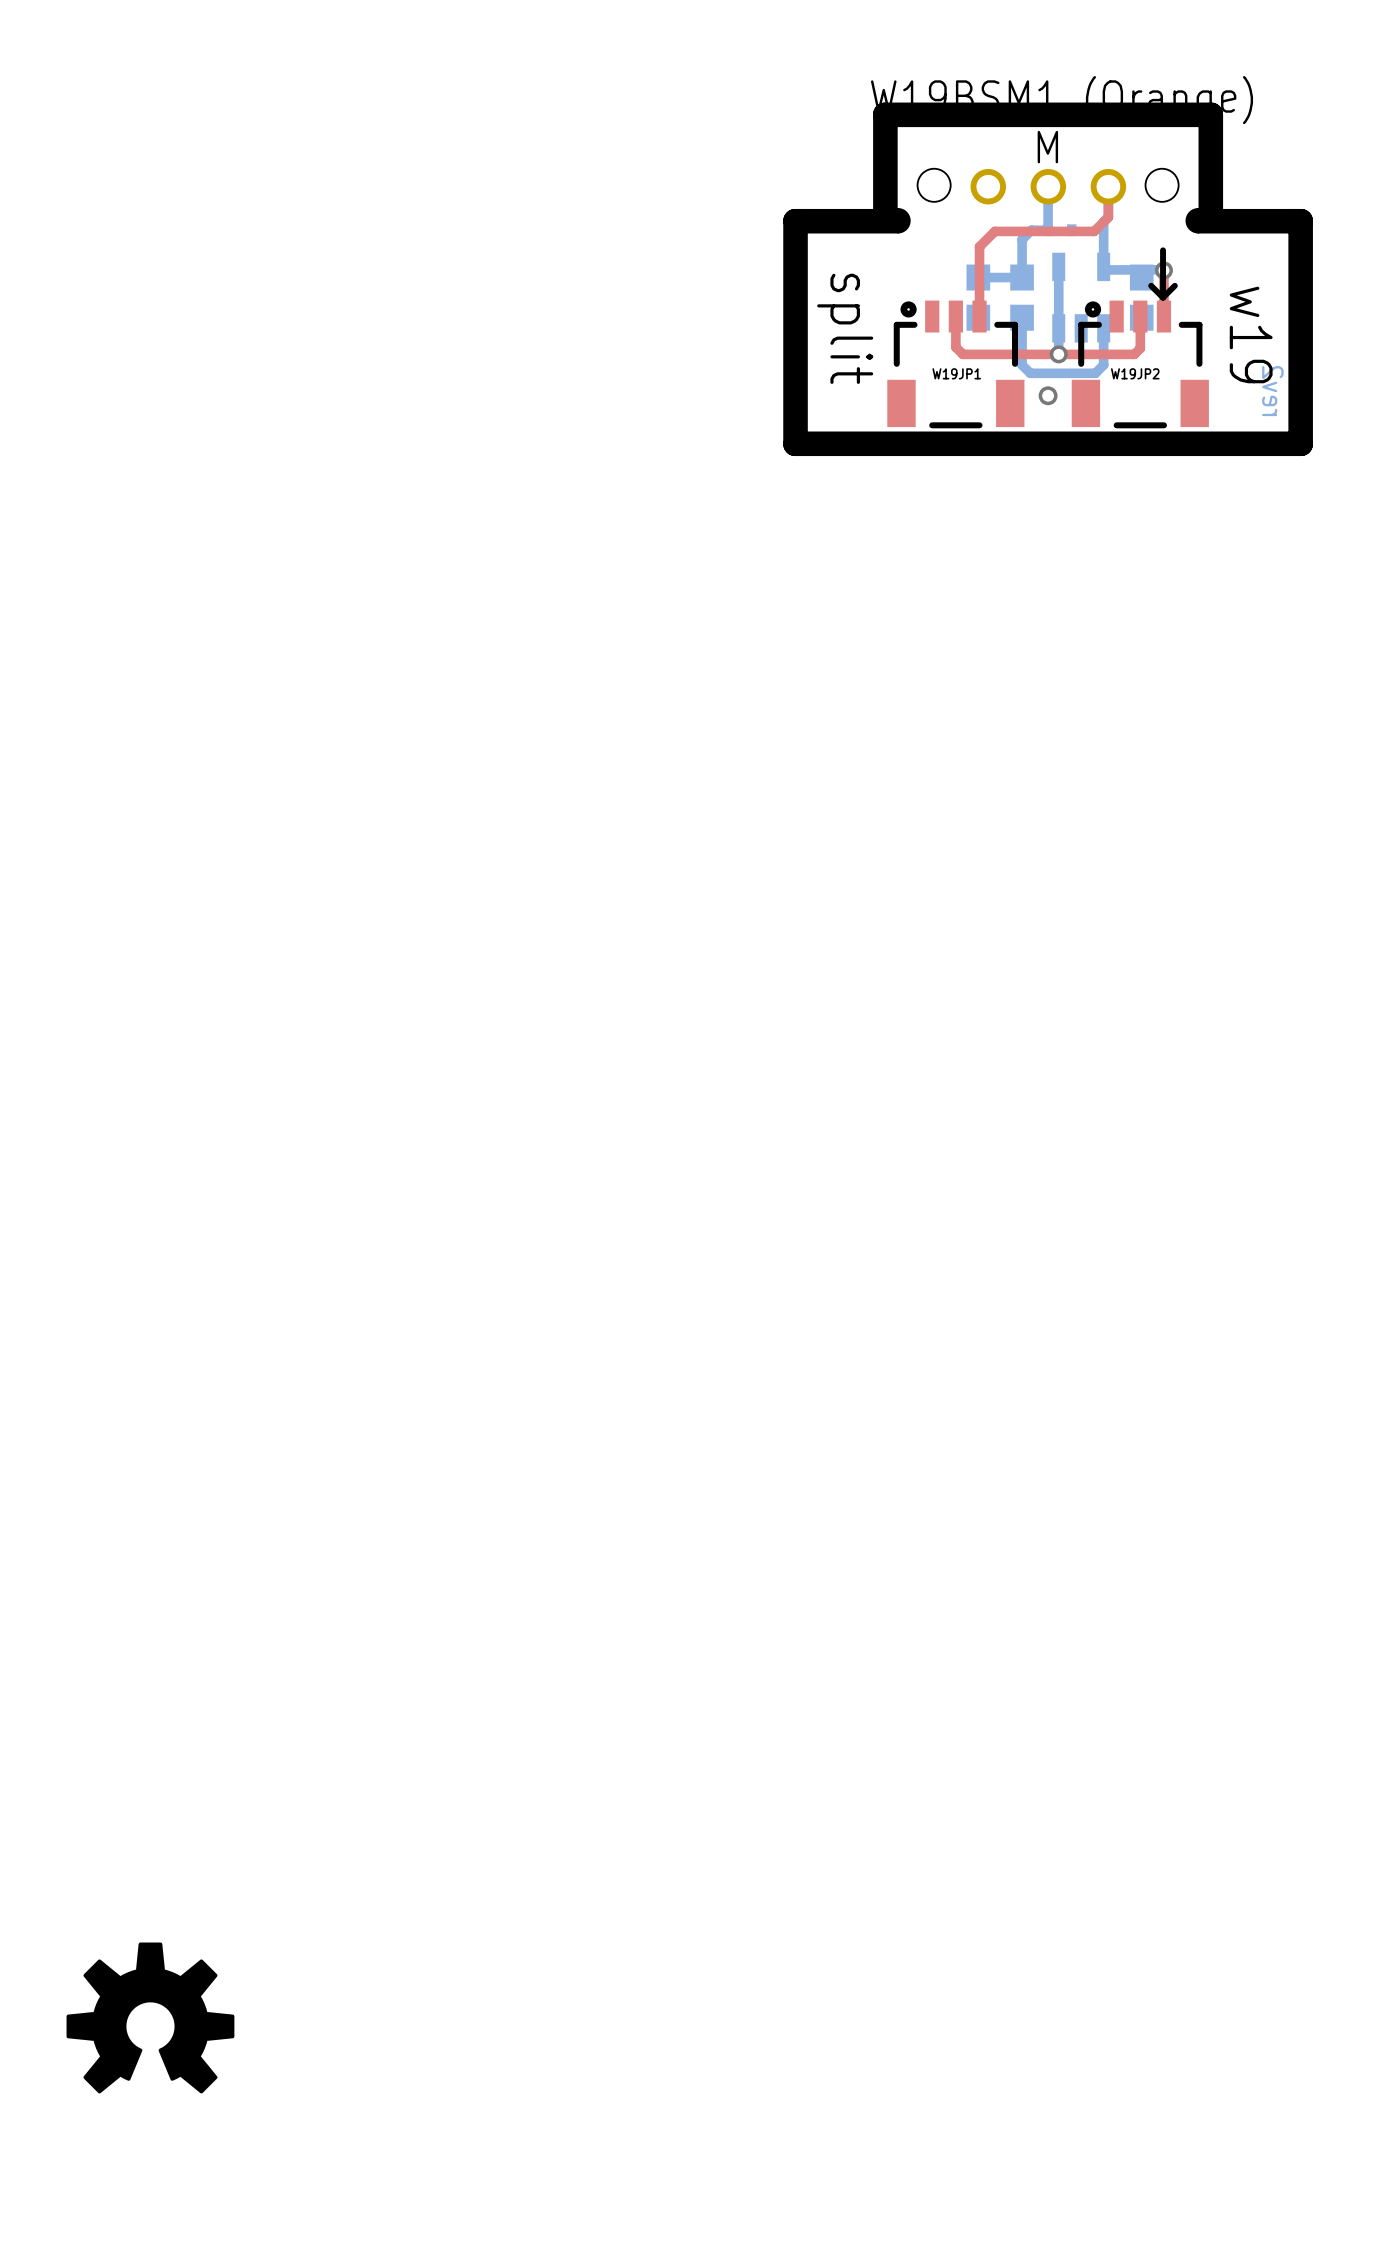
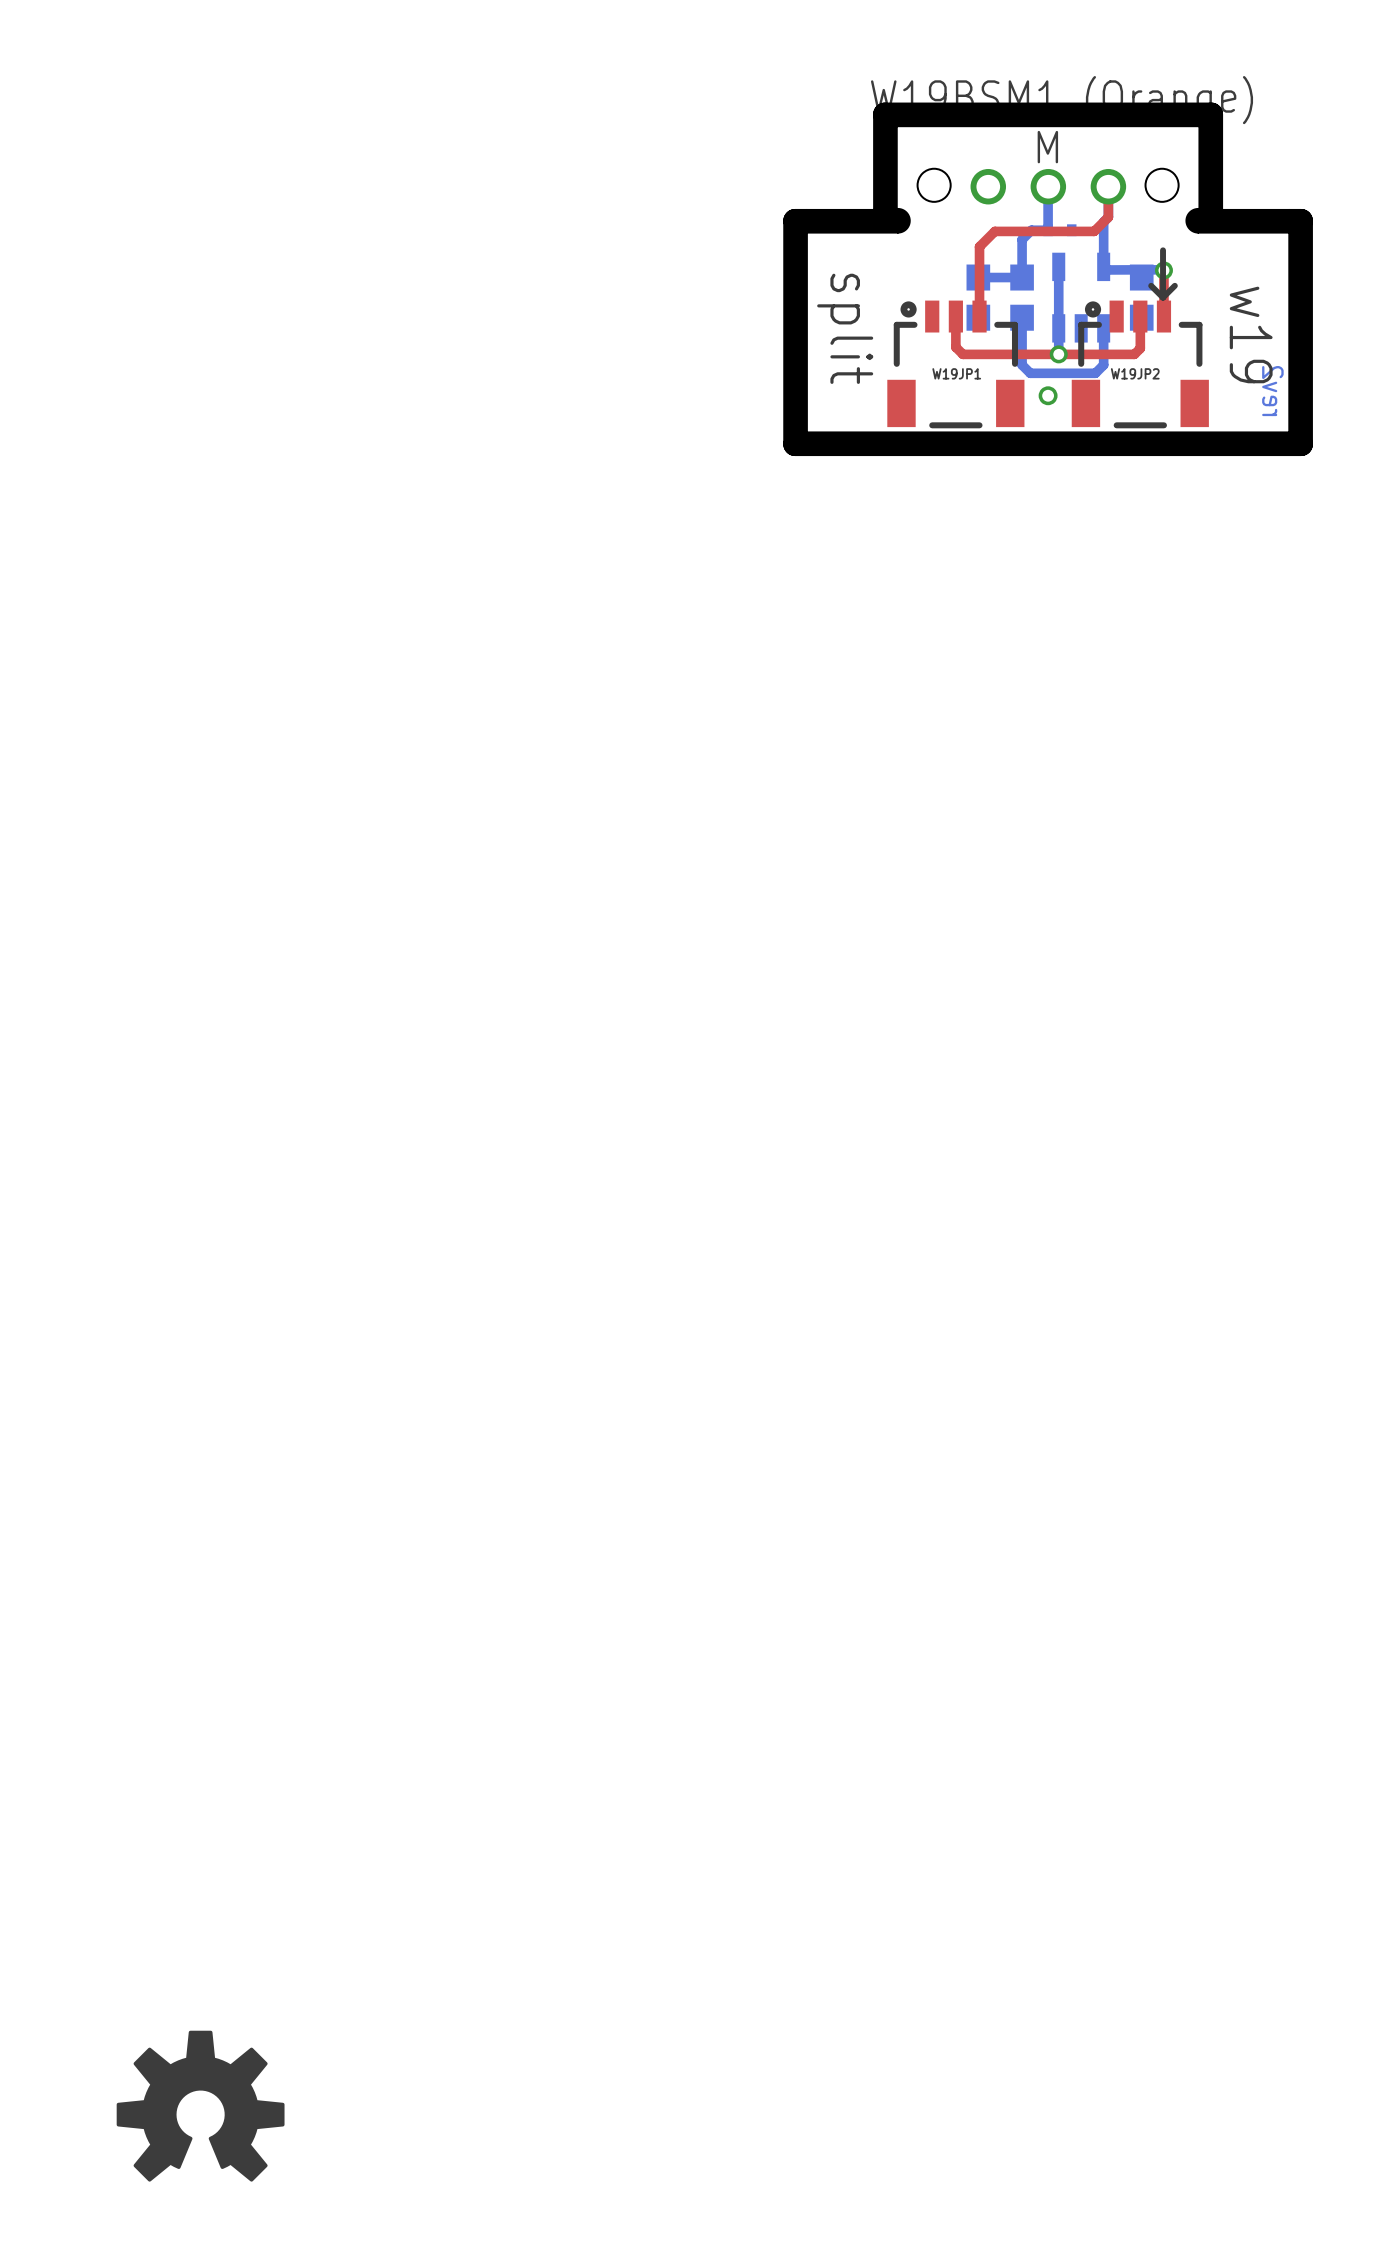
drawing position: (150, 2017) -> (200, 2106)

